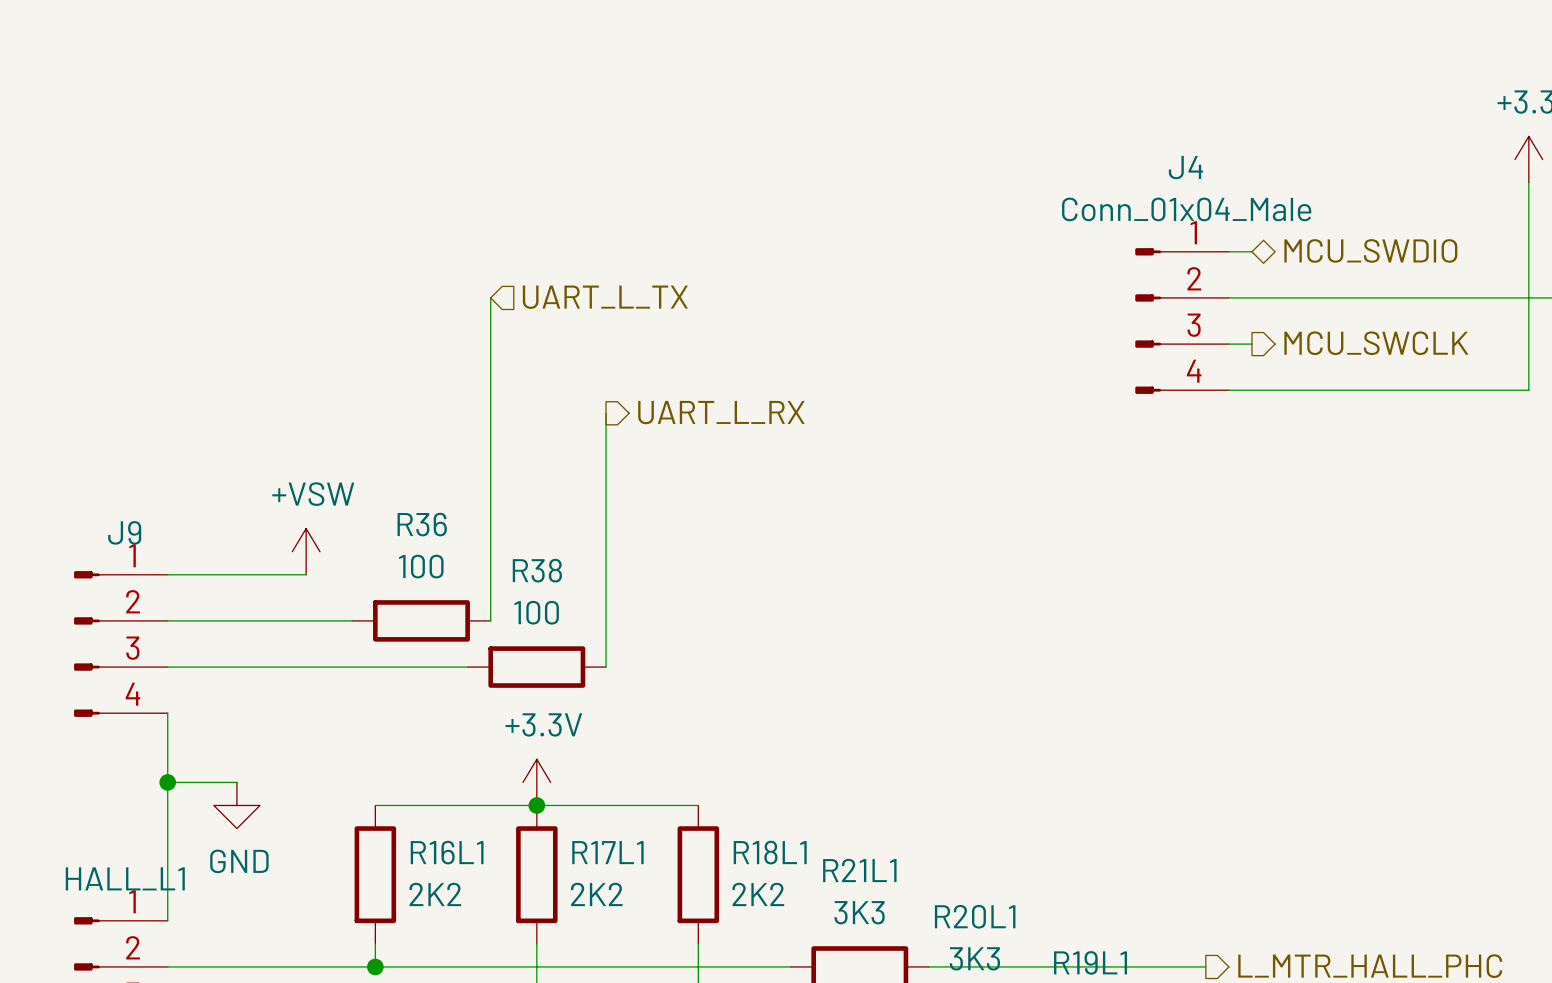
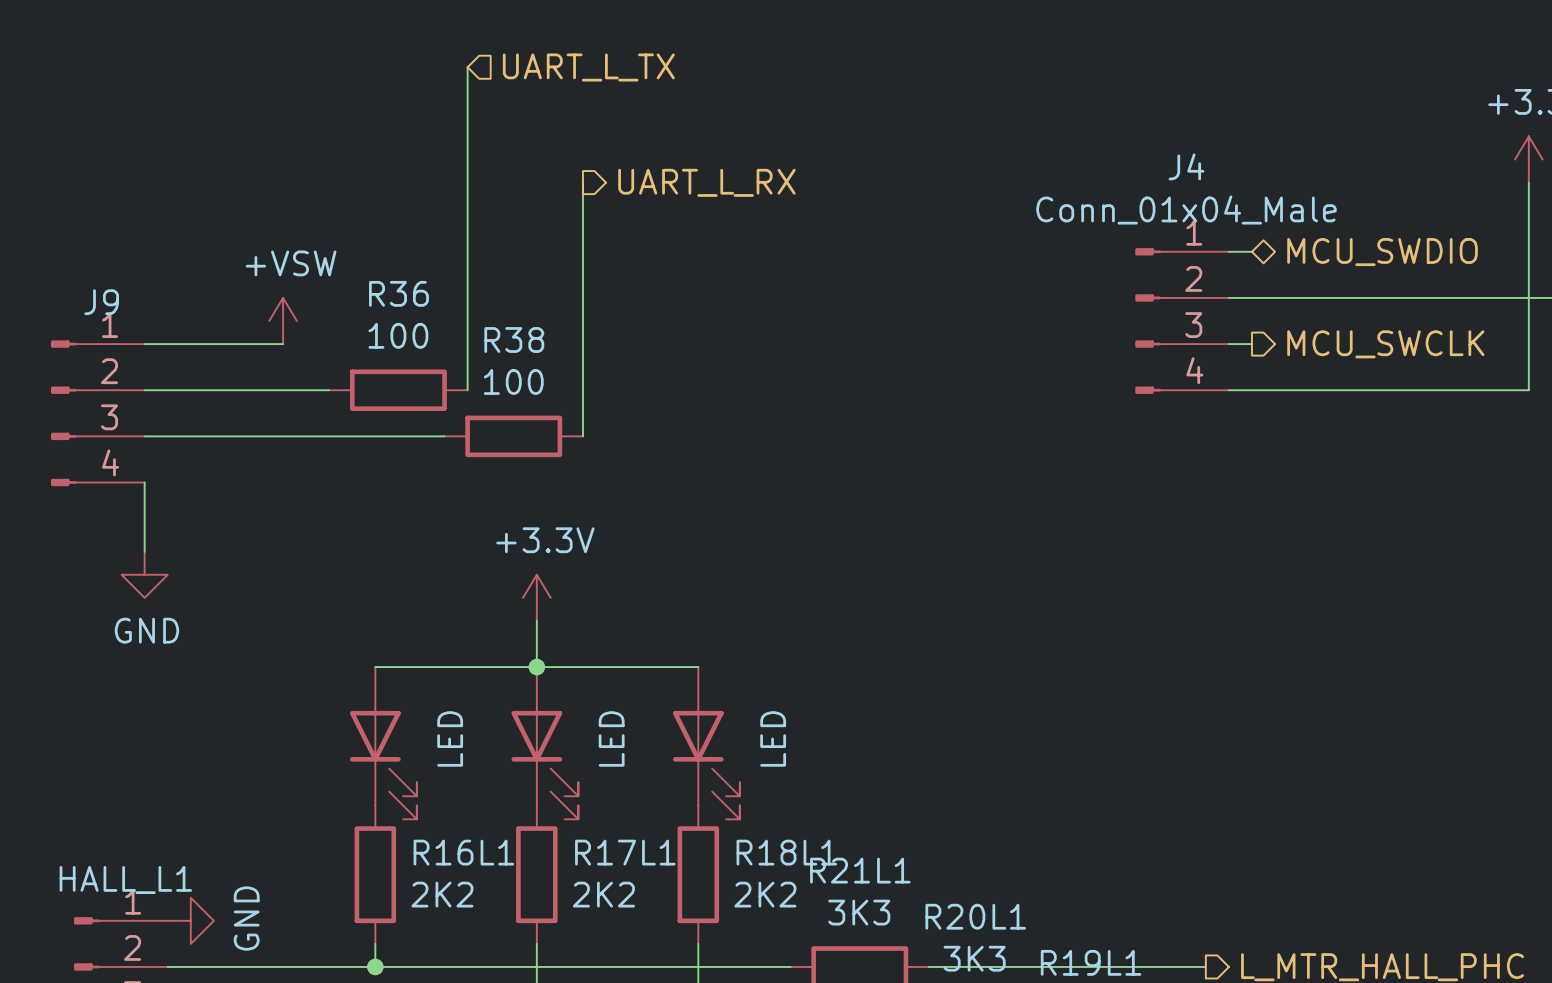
wire: (490, 297) (490, 620) -> (467, 67) (467, 390)
hierarchical label position: UART_L_TX (605, 297) -> UART_L_TX (588, 67)
hierarchical label position: UART_L_RX (721, 412) -> UART_L_RX (706, 182)
wire: (606, 413) (606, 667) -> (582, 182) (582, 436)
wire: none -> (144, 436) (444, 436)
wire: none -> (144, 482) (144, 551)
power symbol position: +VSW (306, 551) -> +VSW (283, 321)
power symbol: none -> GND (144, 574)
wire: (167, 574) (306, 574) -> (144, 344) (283, 344)
wire: (167, 620) (352, 620) -> (144, 390) (329, 390)
R36 position: (421, 620) -> (398, 390)
wire: none -> (536, 620) (536, 667)
J9 position: (120, 643) -> (97, 413)
wire: (167, 667) (375, 667) -> none
wire: none -> (467, 667) (698, 667)
R38 position: (536, 667) -> (513, 436)
junction: none -> (536, 667)
wire: (167, 713) (167, 920) -> none
part: none -> LED (383, 743)
part: none -> LED (544, 743)
part: none -> LED (706, 743)
wire: (167, 782) (236, 782) -> none
junction: (167, 782) -> none
power symbol position: +3.3V (536, 782) -> +3.3V (536, 597)
power symbol: GND (236, 805) -> none
wire: (375, 805) (698, 805) -> none
junction: (536, 805) -> none
power symbol: none -> GND (190, 920)

